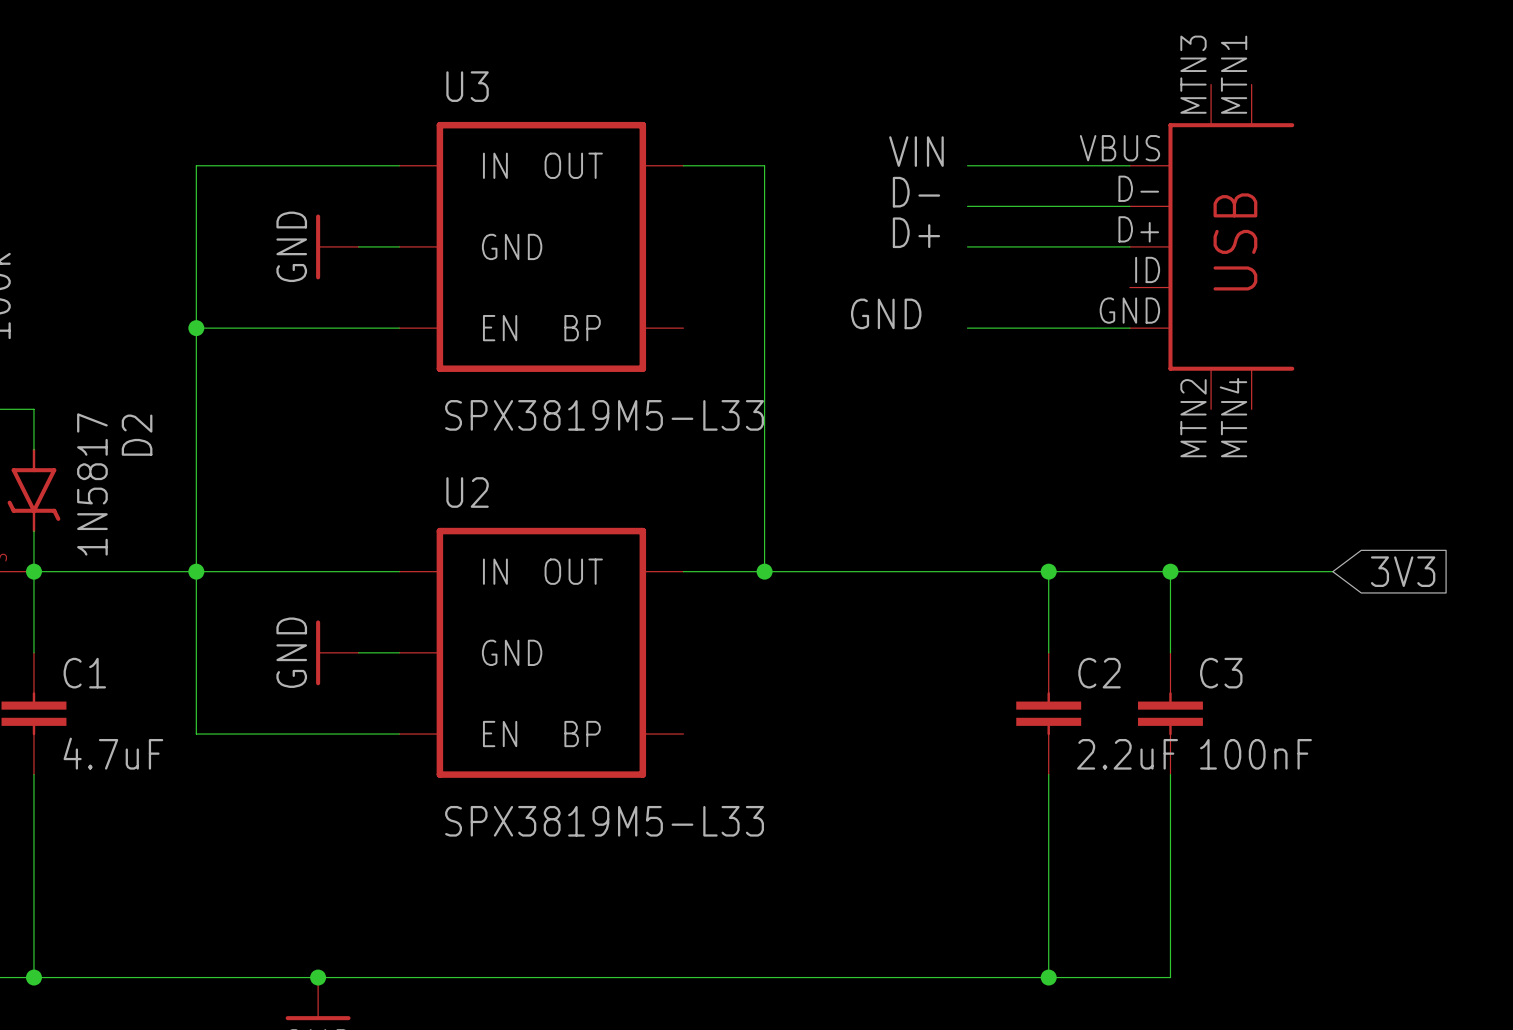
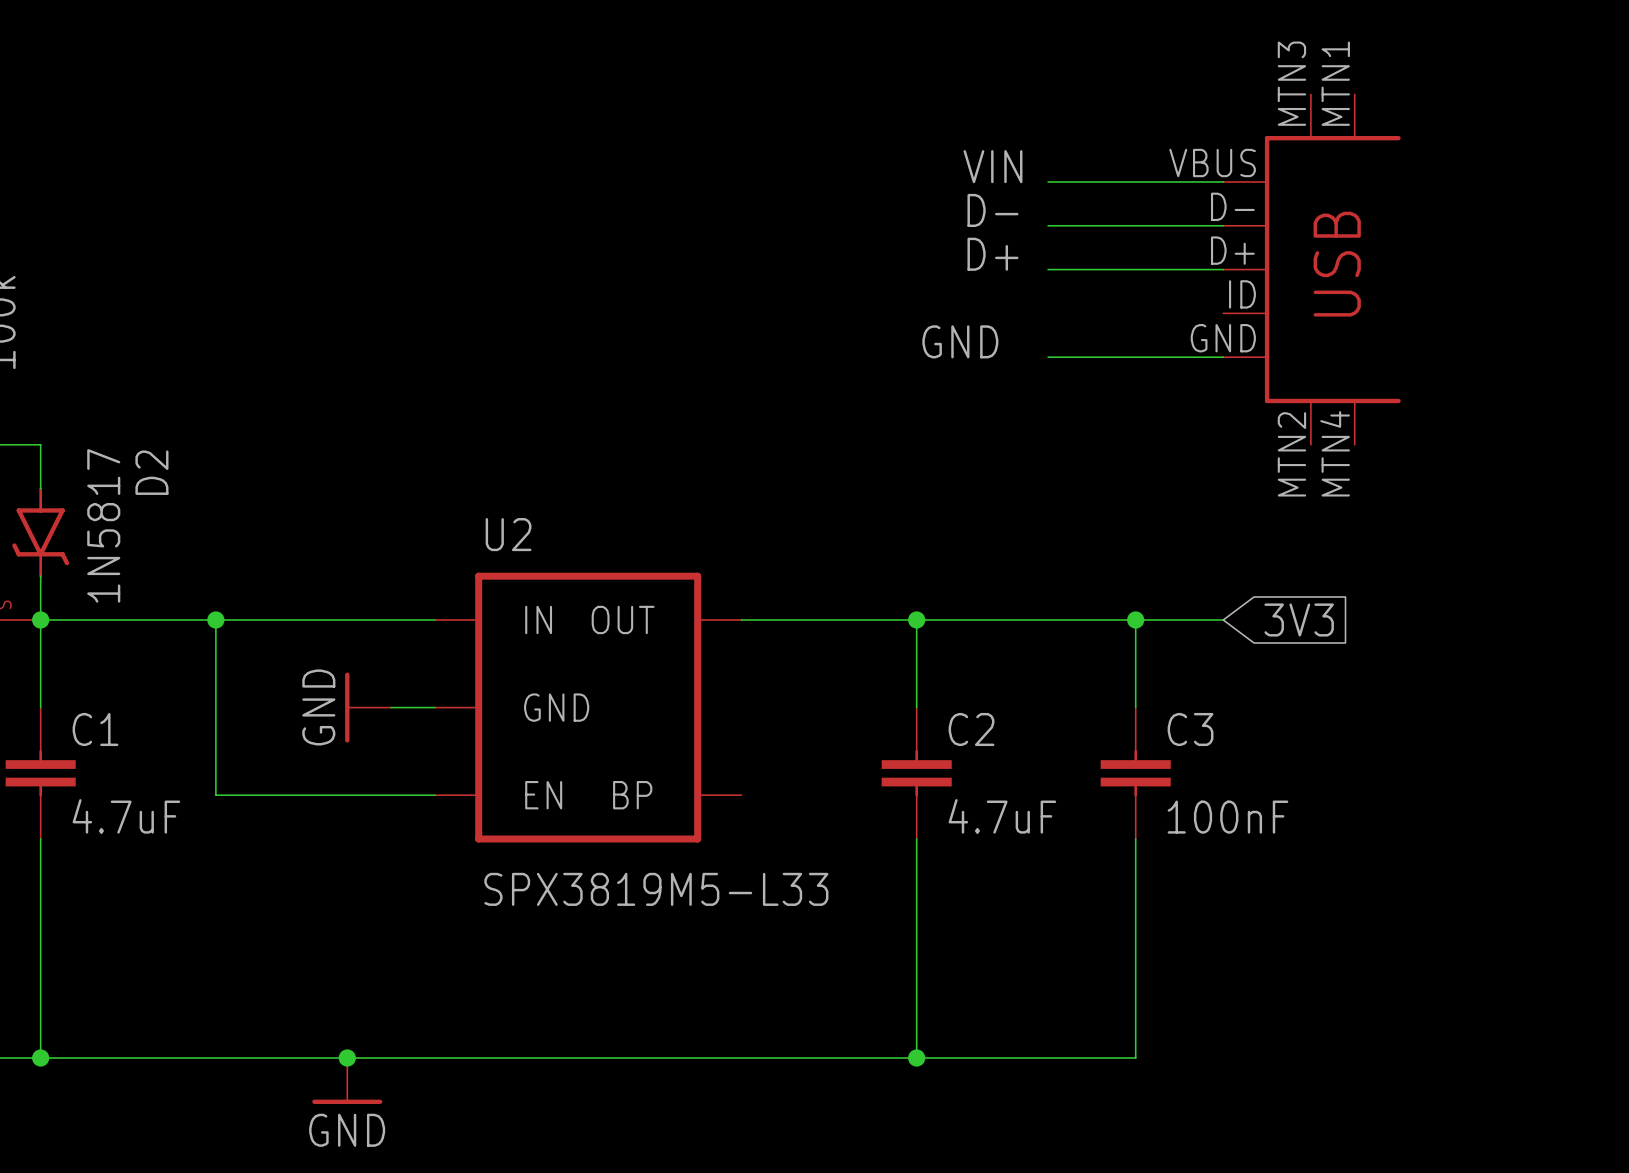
wire: (399, 165) (196, 165) (196, 571) -> none
wire: (683, 165) (764, 165) (764, 571) -> none
power symbol: GND (337, 246) -> none
wire: (358, 246) (399, 246) -> none
U3: SPX3819M5-L33 (541, 246) -> none
wire: (196, 328) (399, 328) -> none
junction: (196, 328) -> none
junction position: (764, 571) -> (916, 619)
wire: (1129, 571) (1332, 571) -> none
wire: (1170, 571) (1170, 652) -> (916, 619) (916, 707)
junction: (1170, 571) -> none
global label position: 3V3 (1403, 571) -> 3V3 (1299, 619)
C2 name: C2 (1099, 673) -> C3 (1190, 729)
C2: none -> 4.7uF (916, 773)
C3: 100nF (1170, 713) -> none
C2 value: 2.2uF (1127, 754) -> 100nF (1227, 817)
wire: none -> (916, 838) (916, 1058)
wire: (1170, 774) (1170, 977) (1048, 977) -> none
junction: none -> (916, 1058)
junction: (1048, 977) -> none

